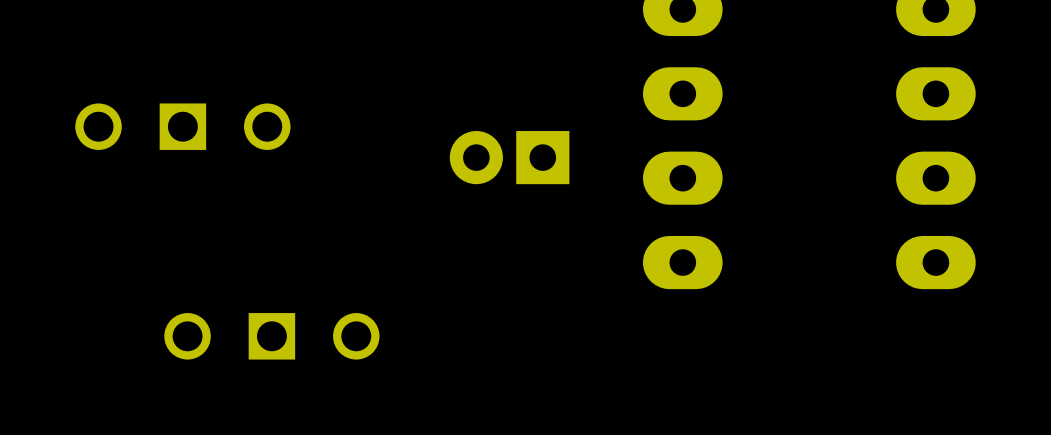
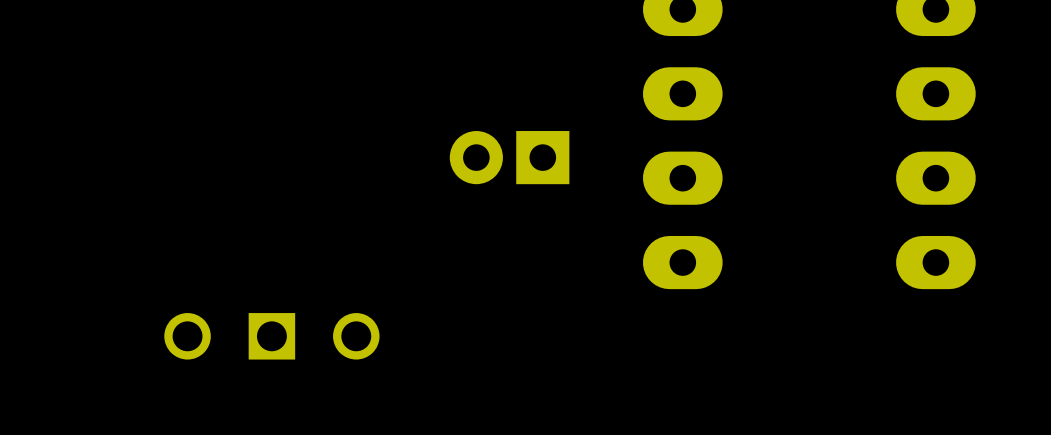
part: (182, 126) -> none

